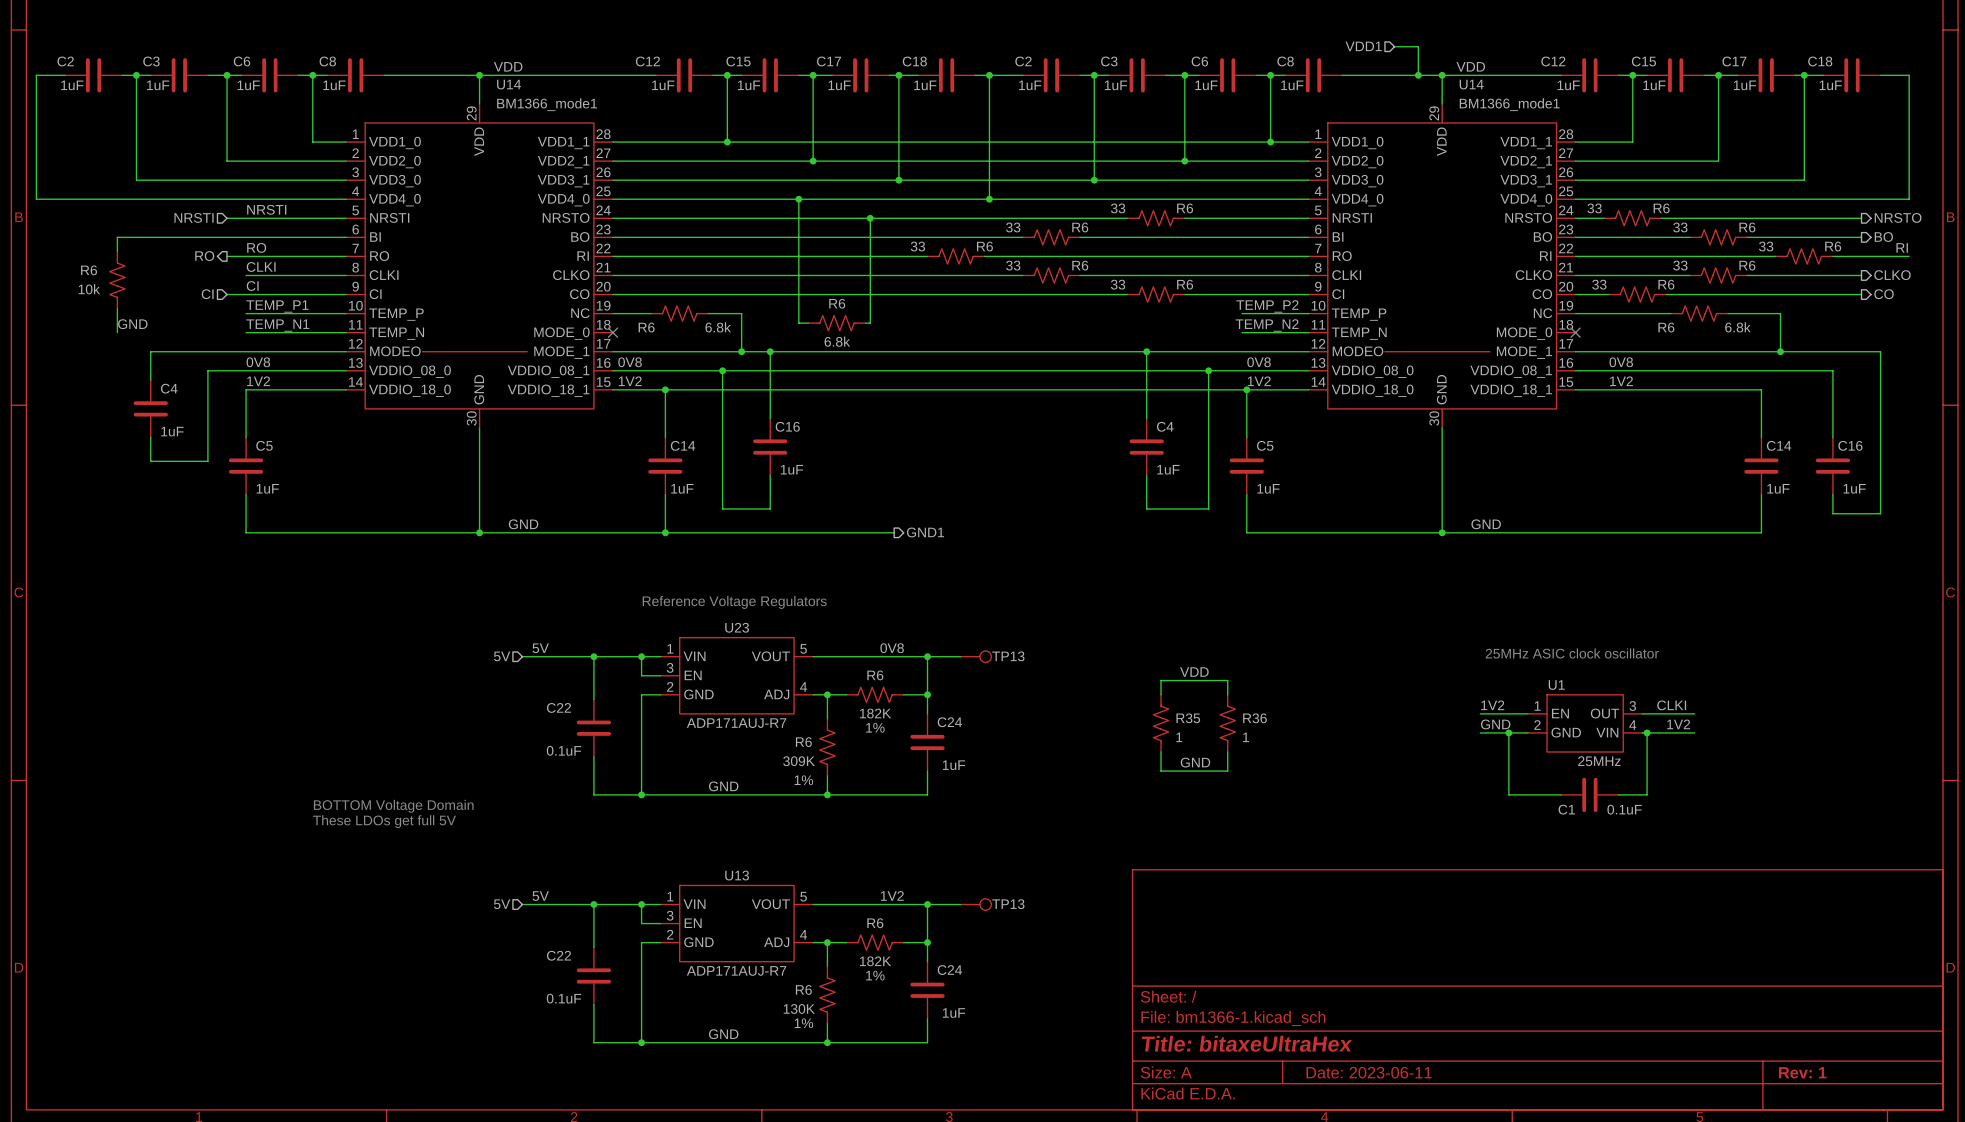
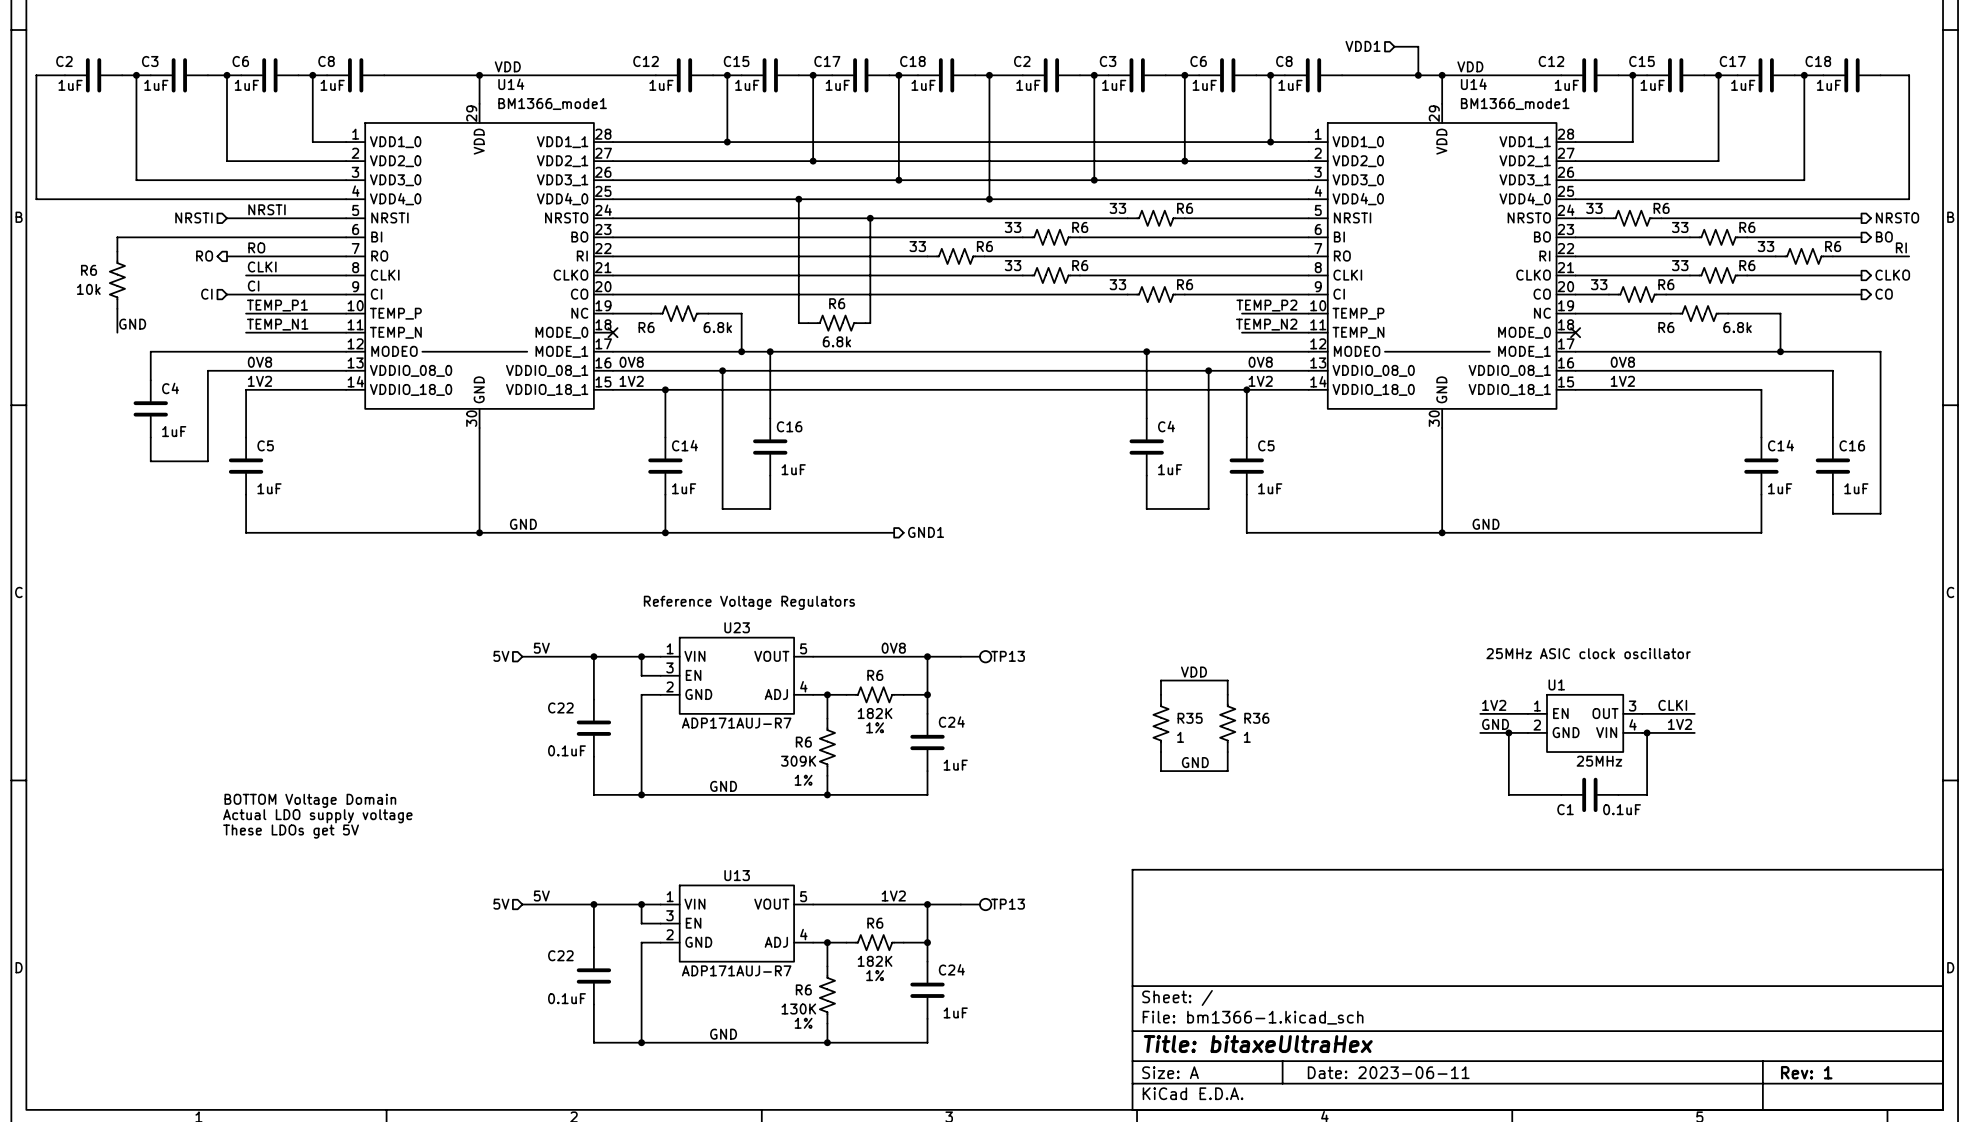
text position: BOTTOM Voltage Domain (393, 806) -> BOTTOM Voltage Domain (310, 800)
text: none -> Actual LDO supply voltage (317, 816)
text: These LDOs get full 5V (384, 821) -> These LDOs get 5V (291, 831)

